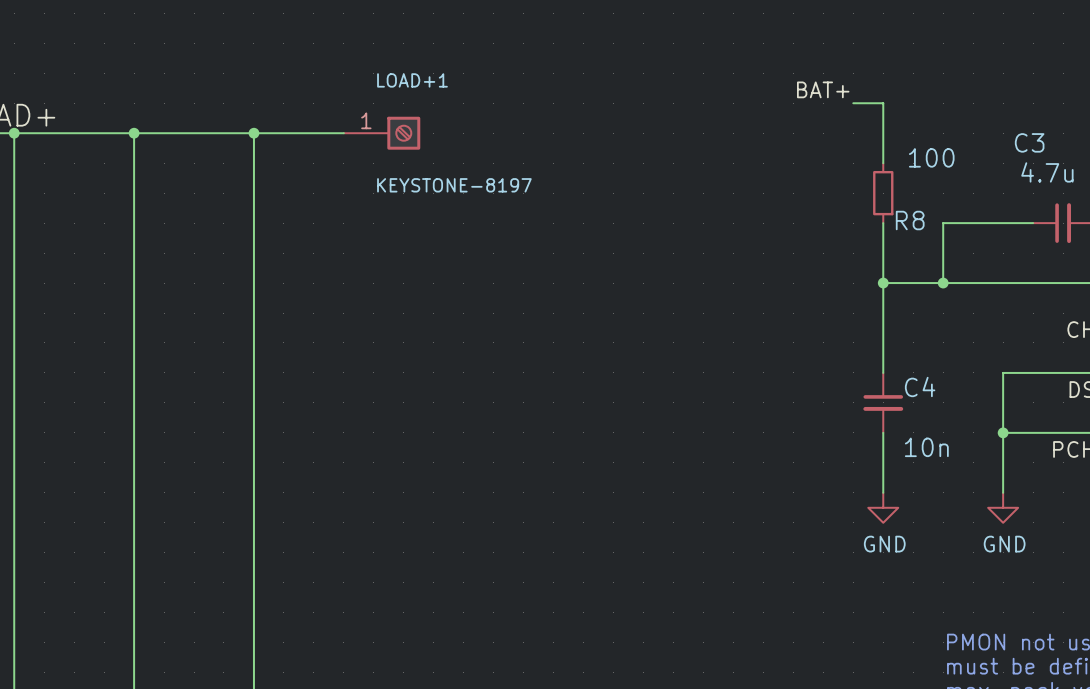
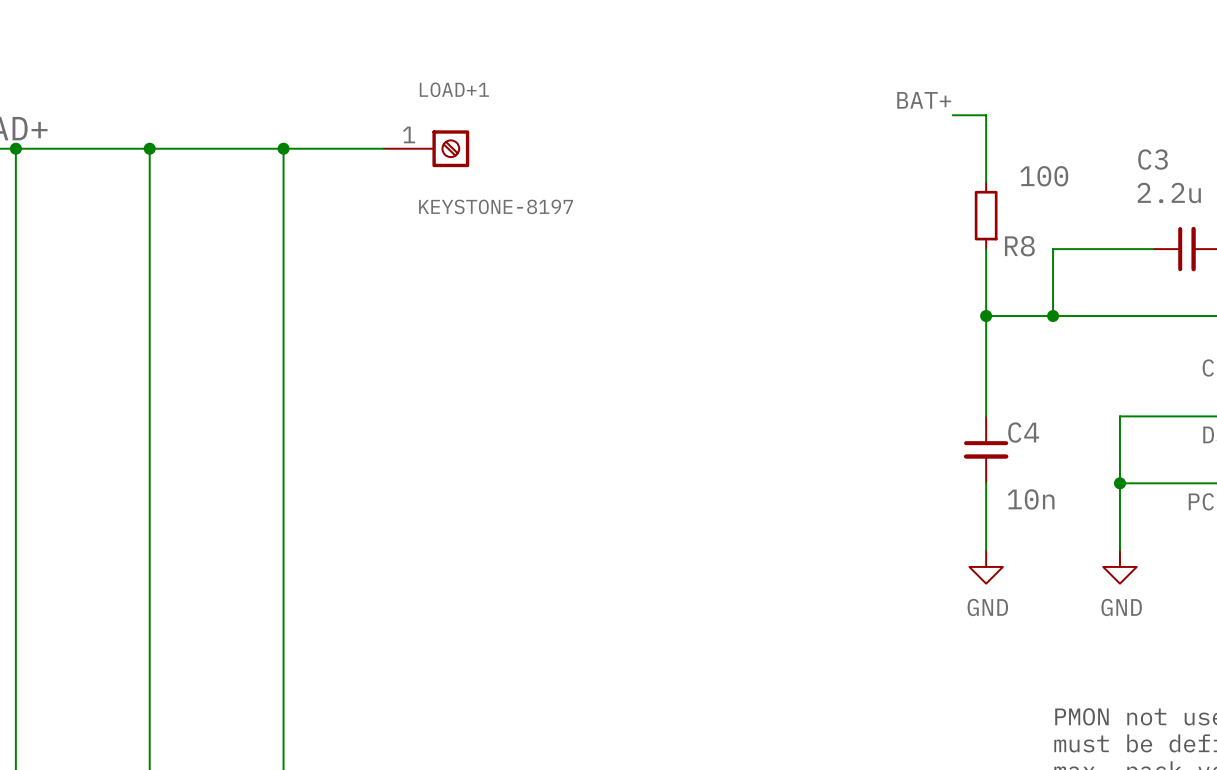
C3 value: 4.7u (1047, 172) -> 2.2u (1169, 193)

